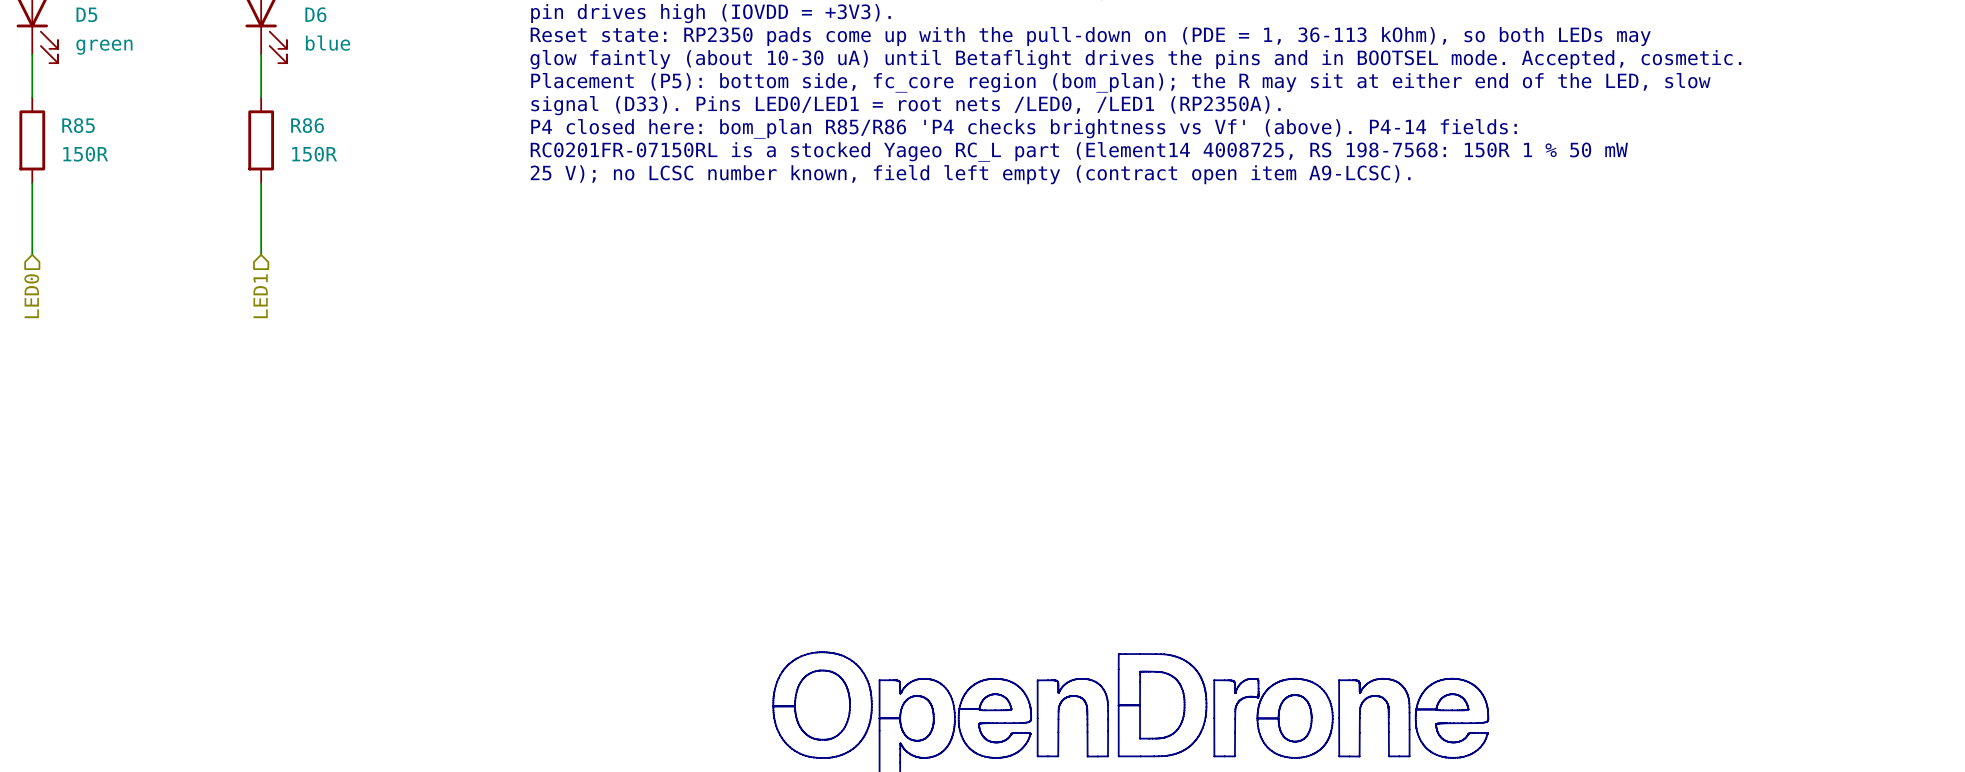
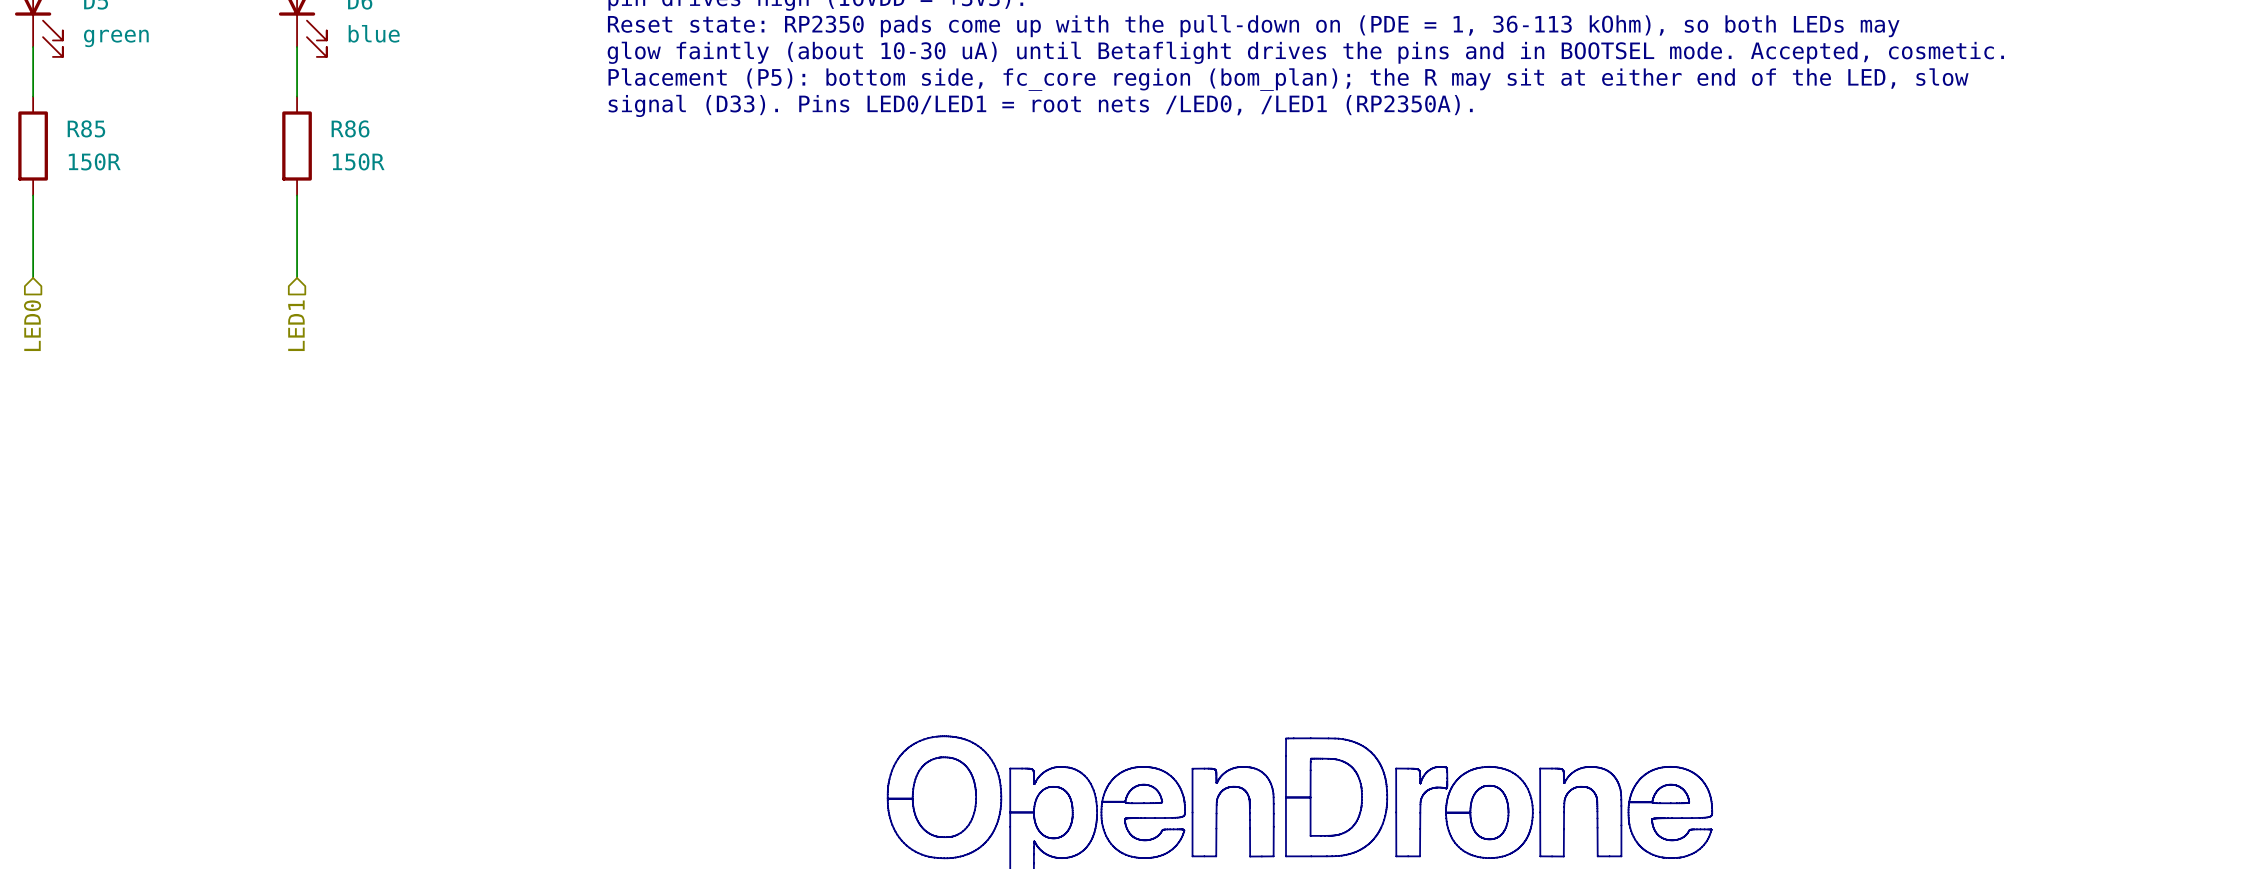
text: P4 closed here: bom_plan R85/R86 'P4 checks brightness vs Vf' (above). P4-14 fields: (1024, 128) -> none
text: RC0201FR-07150RL is a stocked Yageo RC_L part (Element14 4008725, RS 198-7568: 150R 1 % 50 mW (1079, 151) -> none
text: 25 V); no LCSC number known, field left empty (contract open item A9-LCSC). (970, 174) -> none

